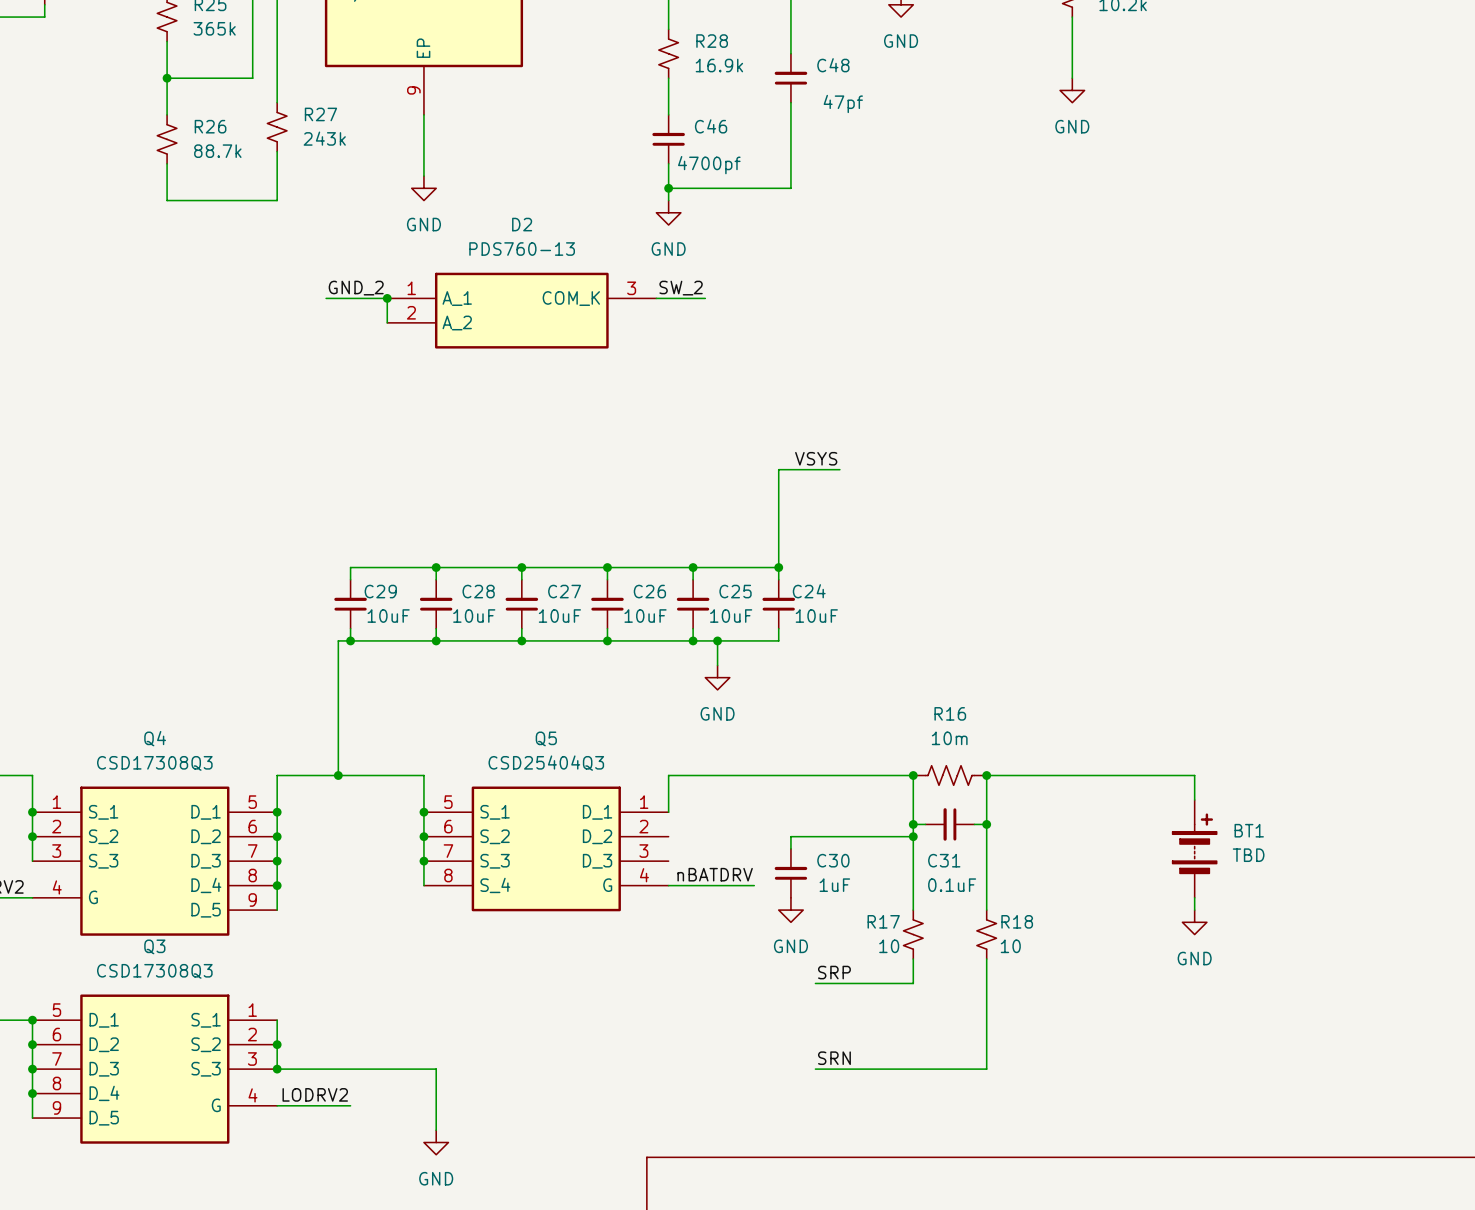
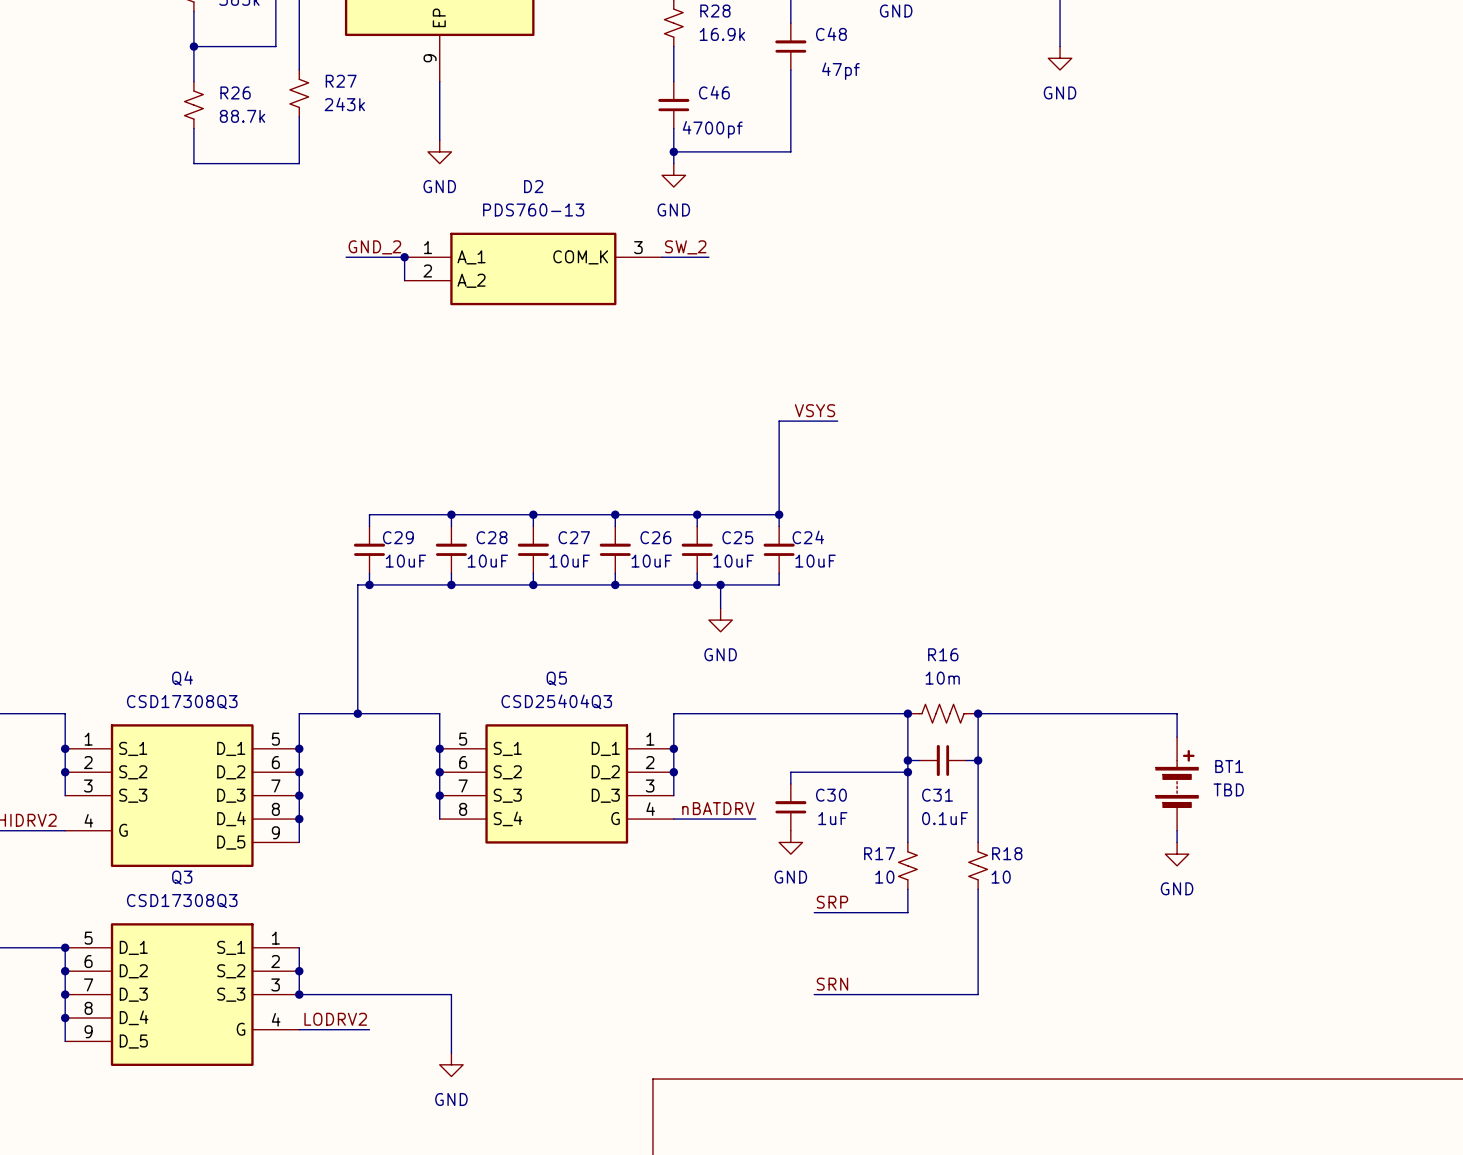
wire: none -> (673, 748) (673, 795)
junction: none -> (673, 748)
junction: none -> (673, 772)

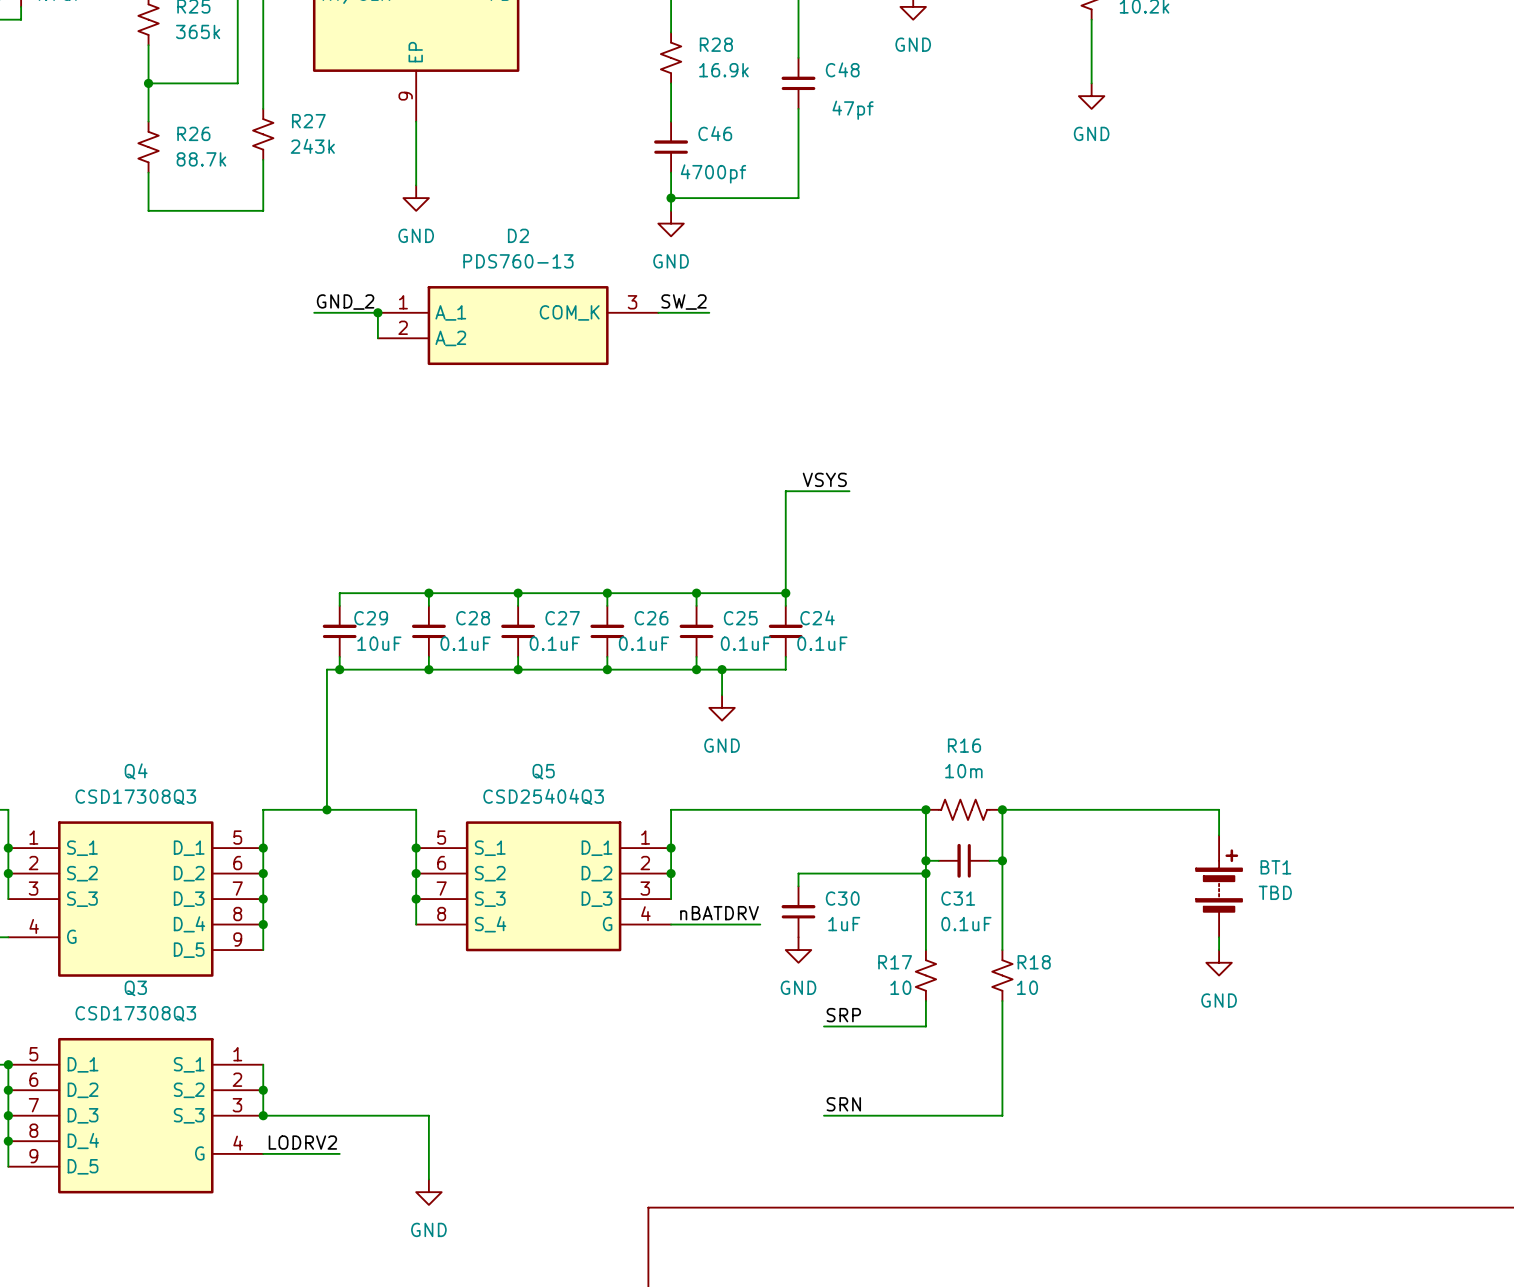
C28 value: 10uF (487, 561) -> 0.1uF (465, 643)
C27 value: 10uF (569, 561) -> 0.1uF (554, 643)
C26 value: 10uF (651, 561) -> 0.1uF (643, 643)
C25 value: 10uF (733, 561) -> 0.1uF (745, 643)
C24 value: 10uF (815, 561) -> 0.1uF (822, 643)

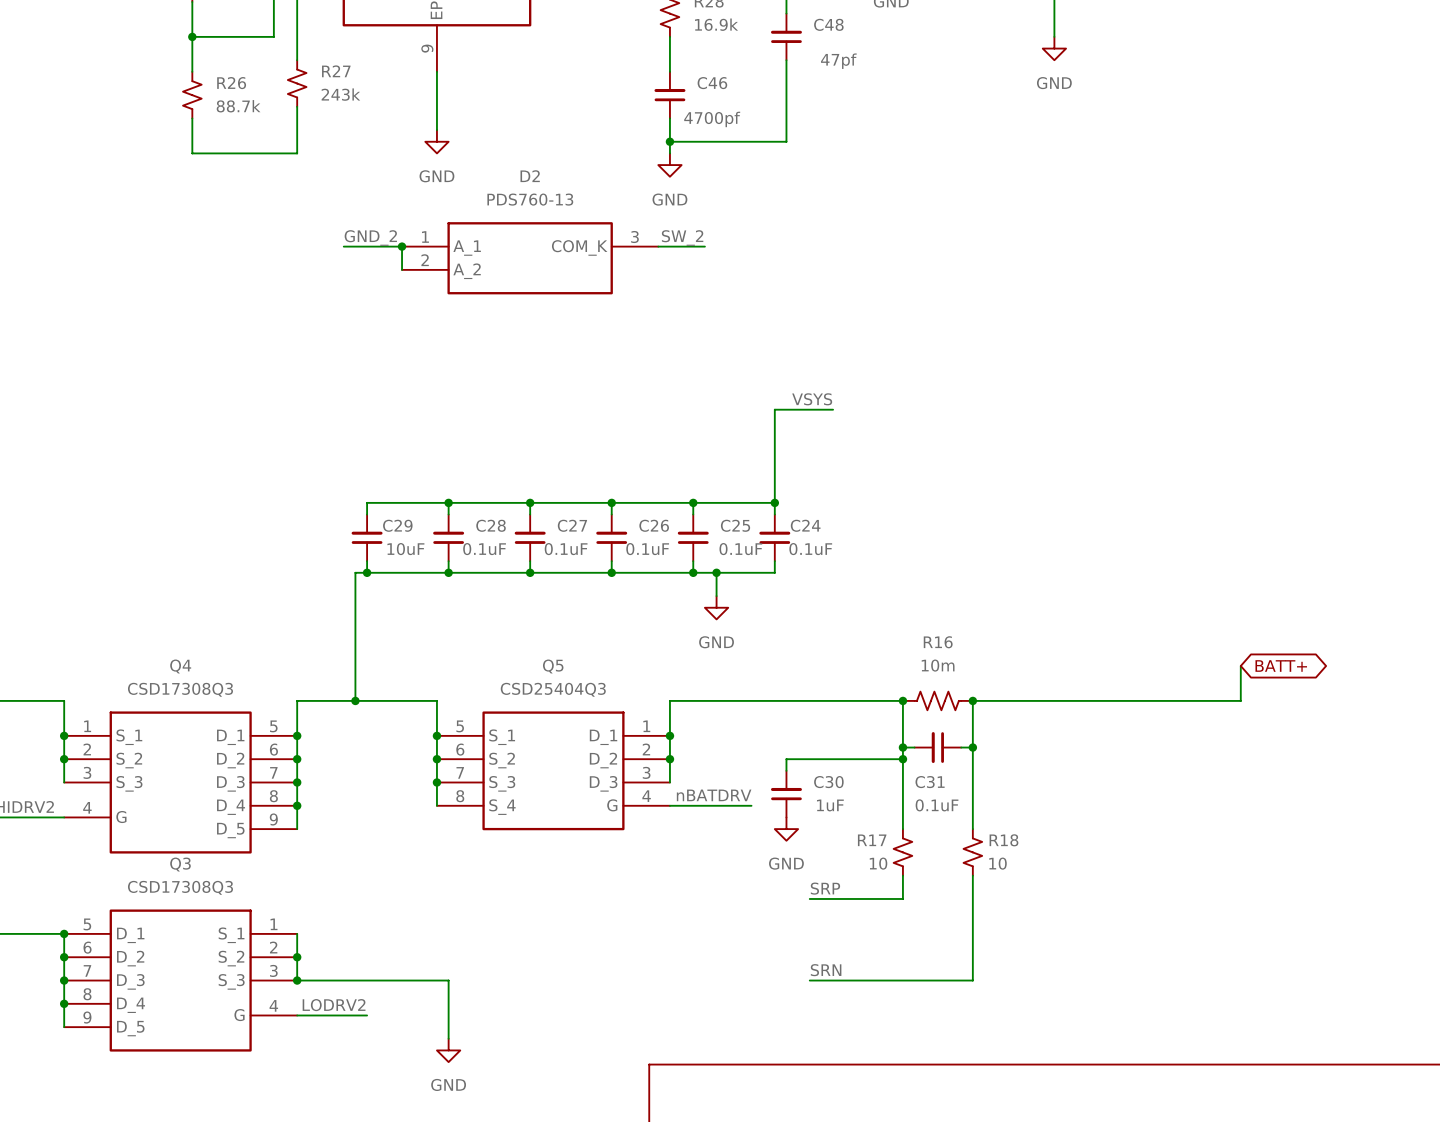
global label: none -> BATT+ (1281, 665)
wire: (1219, 809) (1219, 835) -> (1170, 700) (1240, 700) (1240, 665)
BT1: TBD (1219, 886) -> none
wire: (1219, 937) (1219, 950) -> none
power symbol: GND (1219, 962) -> none

